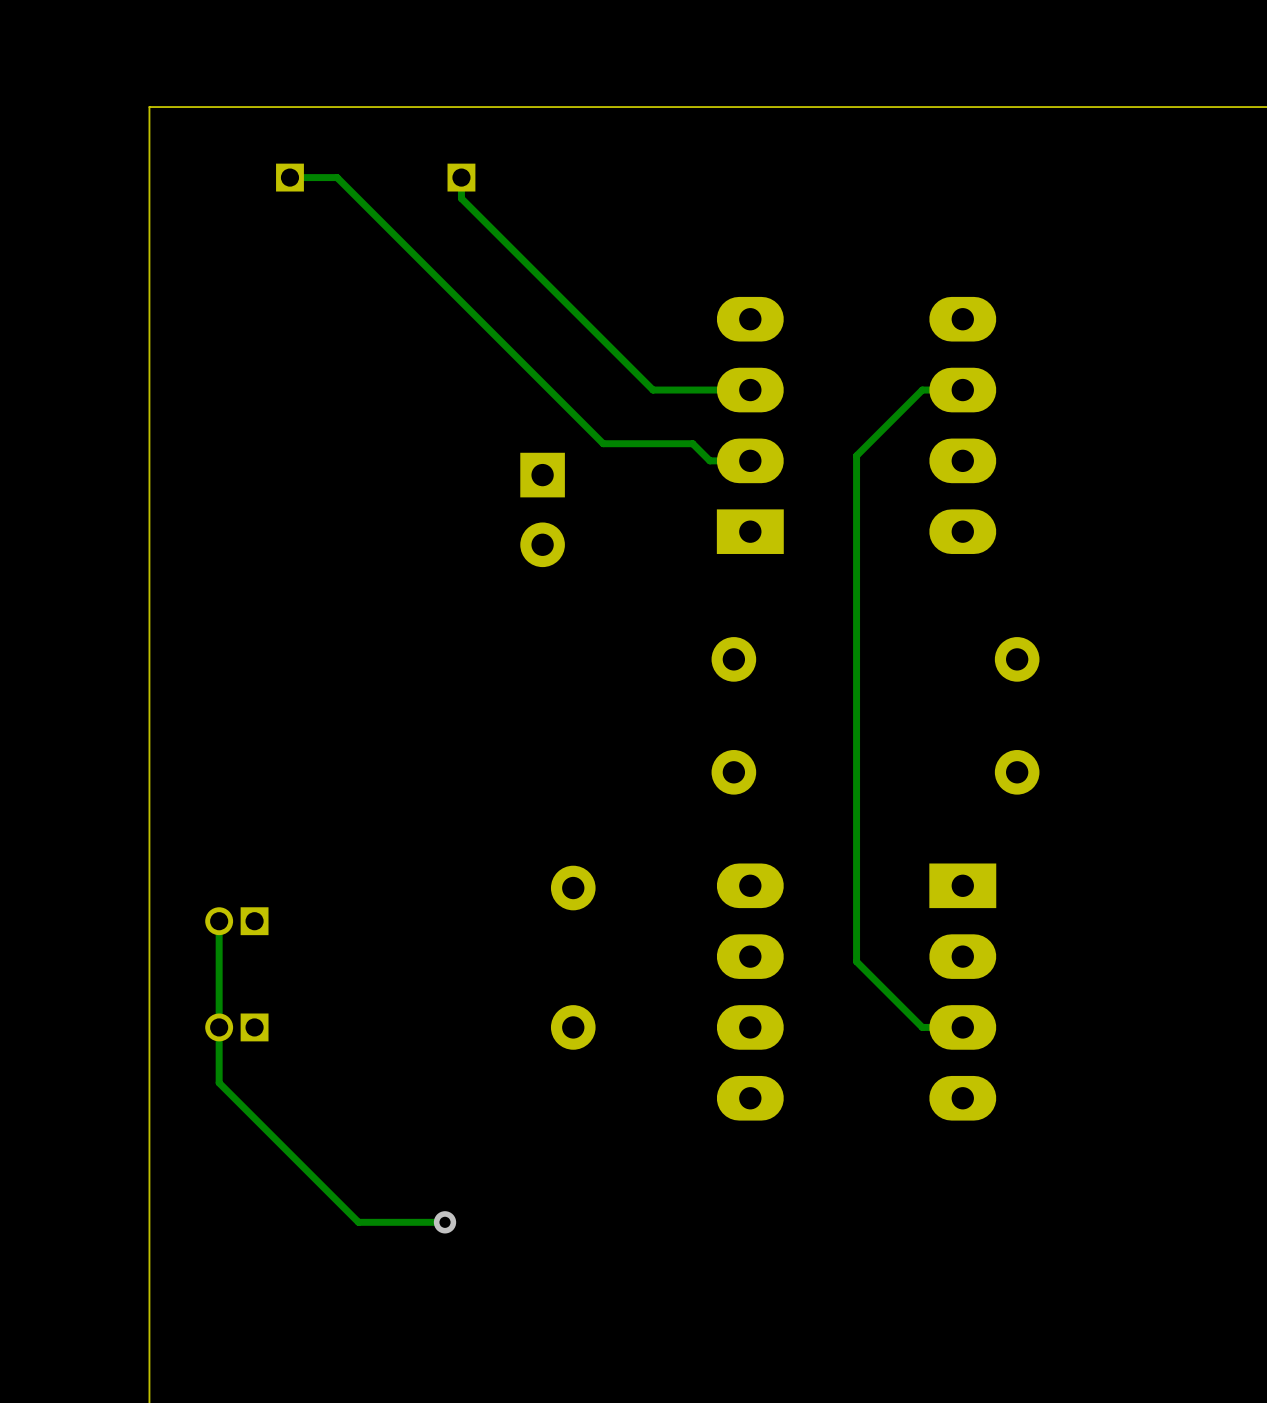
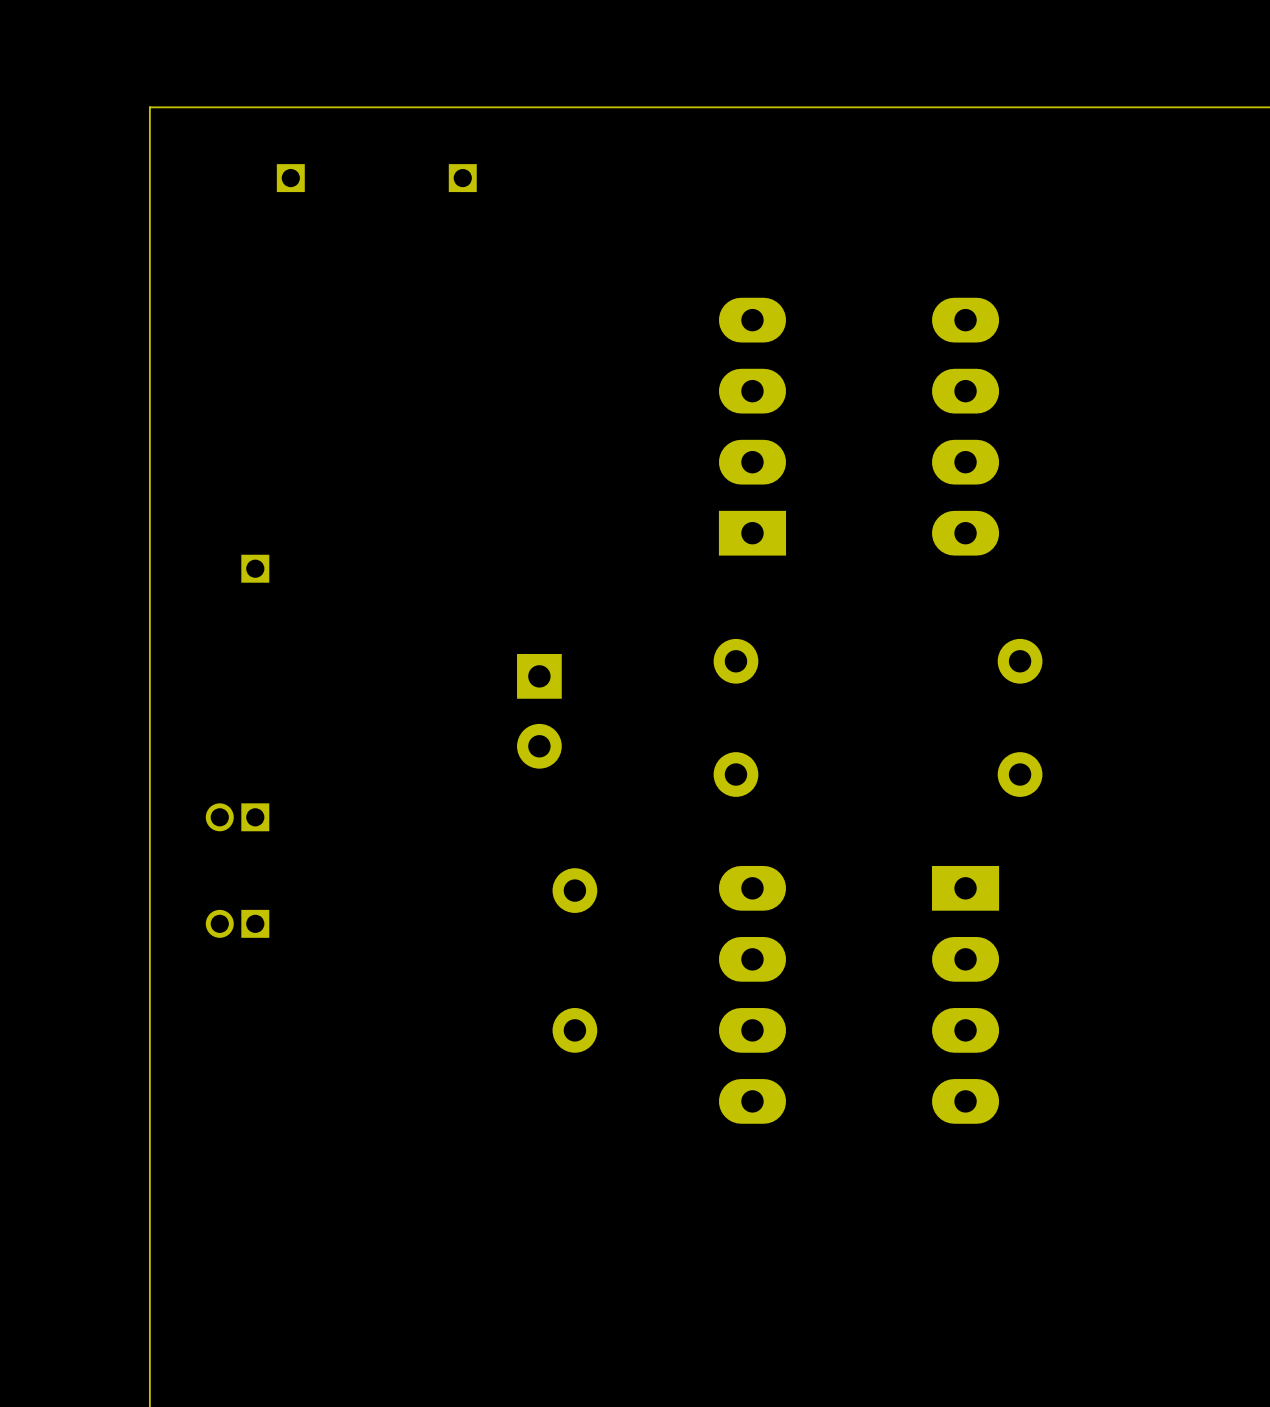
track: (289, 177) (337, 177) (603, 443) (692, 443) (709, 460) (750, 460) -> none
track: (461, 177) (461, 198) (653, 390) (750, 390) -> none
track: (962, 390) (922, 390) (856, 455) (856, 961) (922, 1027) (962, 1027) -> none
part position: (542, 509) -> (539, 711)
part: none -> (255, 568)
track: (219, 921) (219, 1082) (358, 1222) (445, 1222) -> none
part position: (236, 1027) -> (237, 817)
via: (445, 1222) -> none

